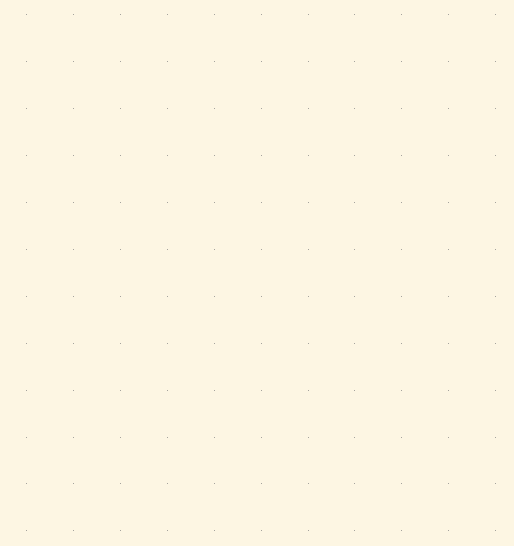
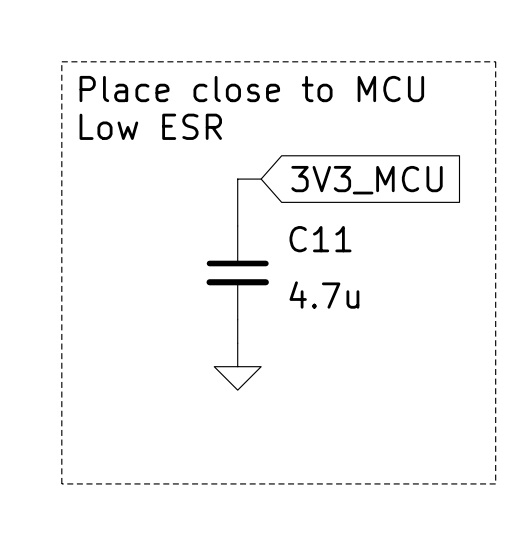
line: none -> (61, 61) (495, 61) (495, 483) (61, 483) (61, 61)
text: none -> Place close to MCU (251, 89)
text: none -> Low ESR (150, 126)
wire: none -> (261, 179) (237, 179) (237, 225)
global label: none -> 3V3_MCU (367, 180)
C11: none -> 4.7u (237, 272)
wire: none -> (237, 319) (237, 343)
power symbol: none -> (237, 366)

